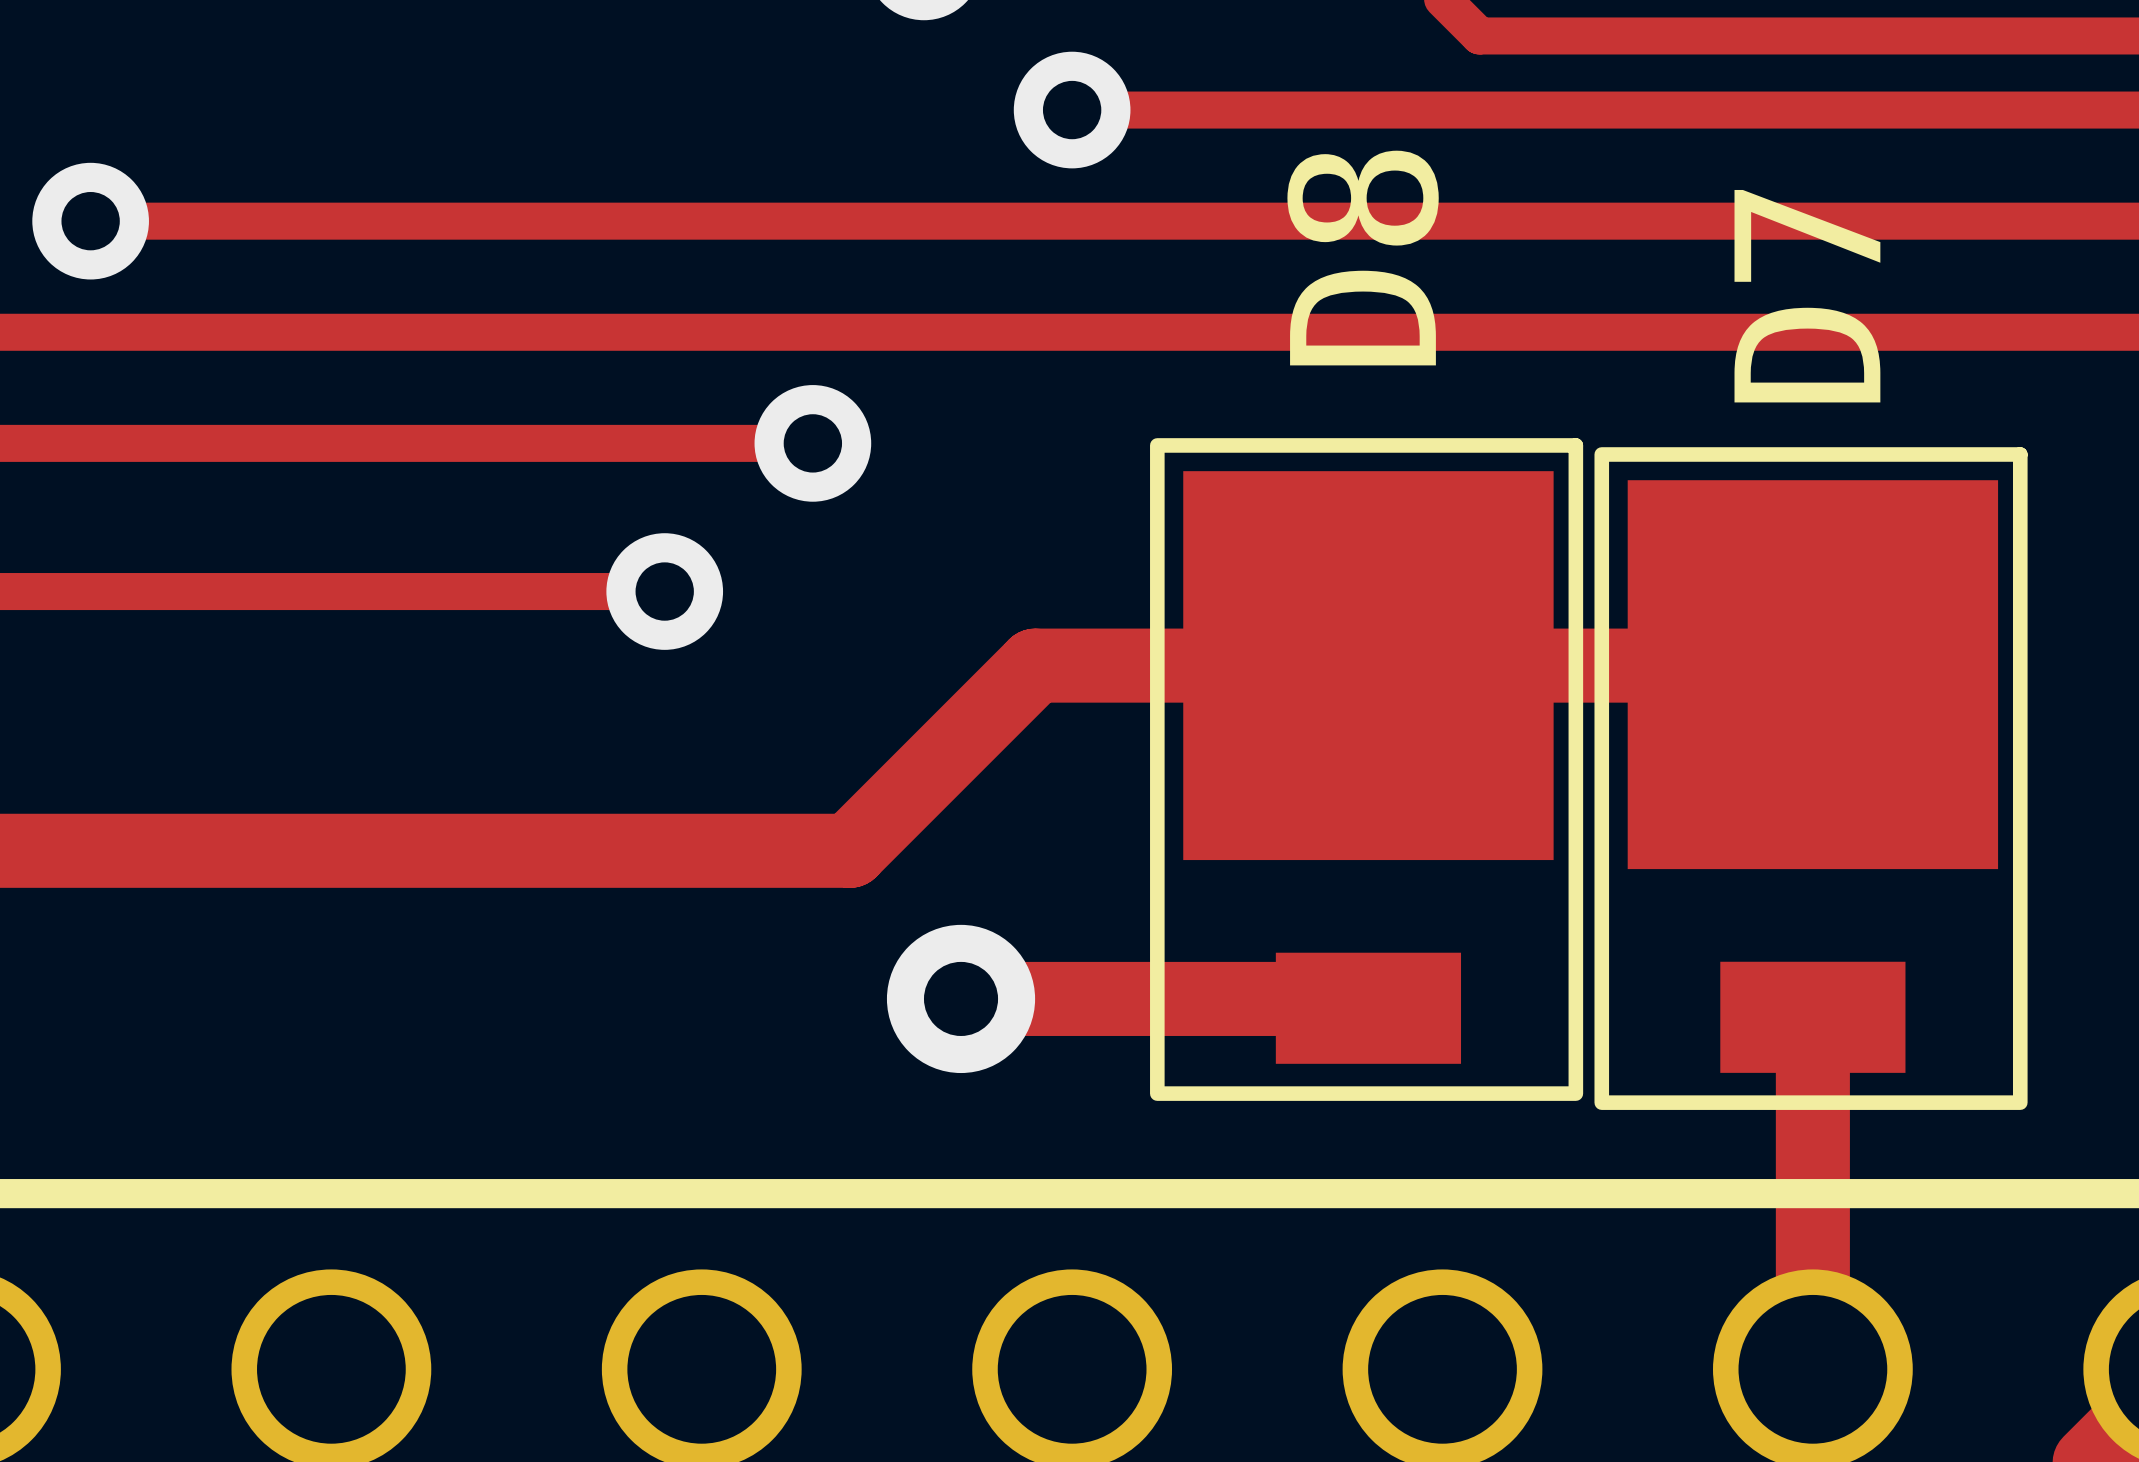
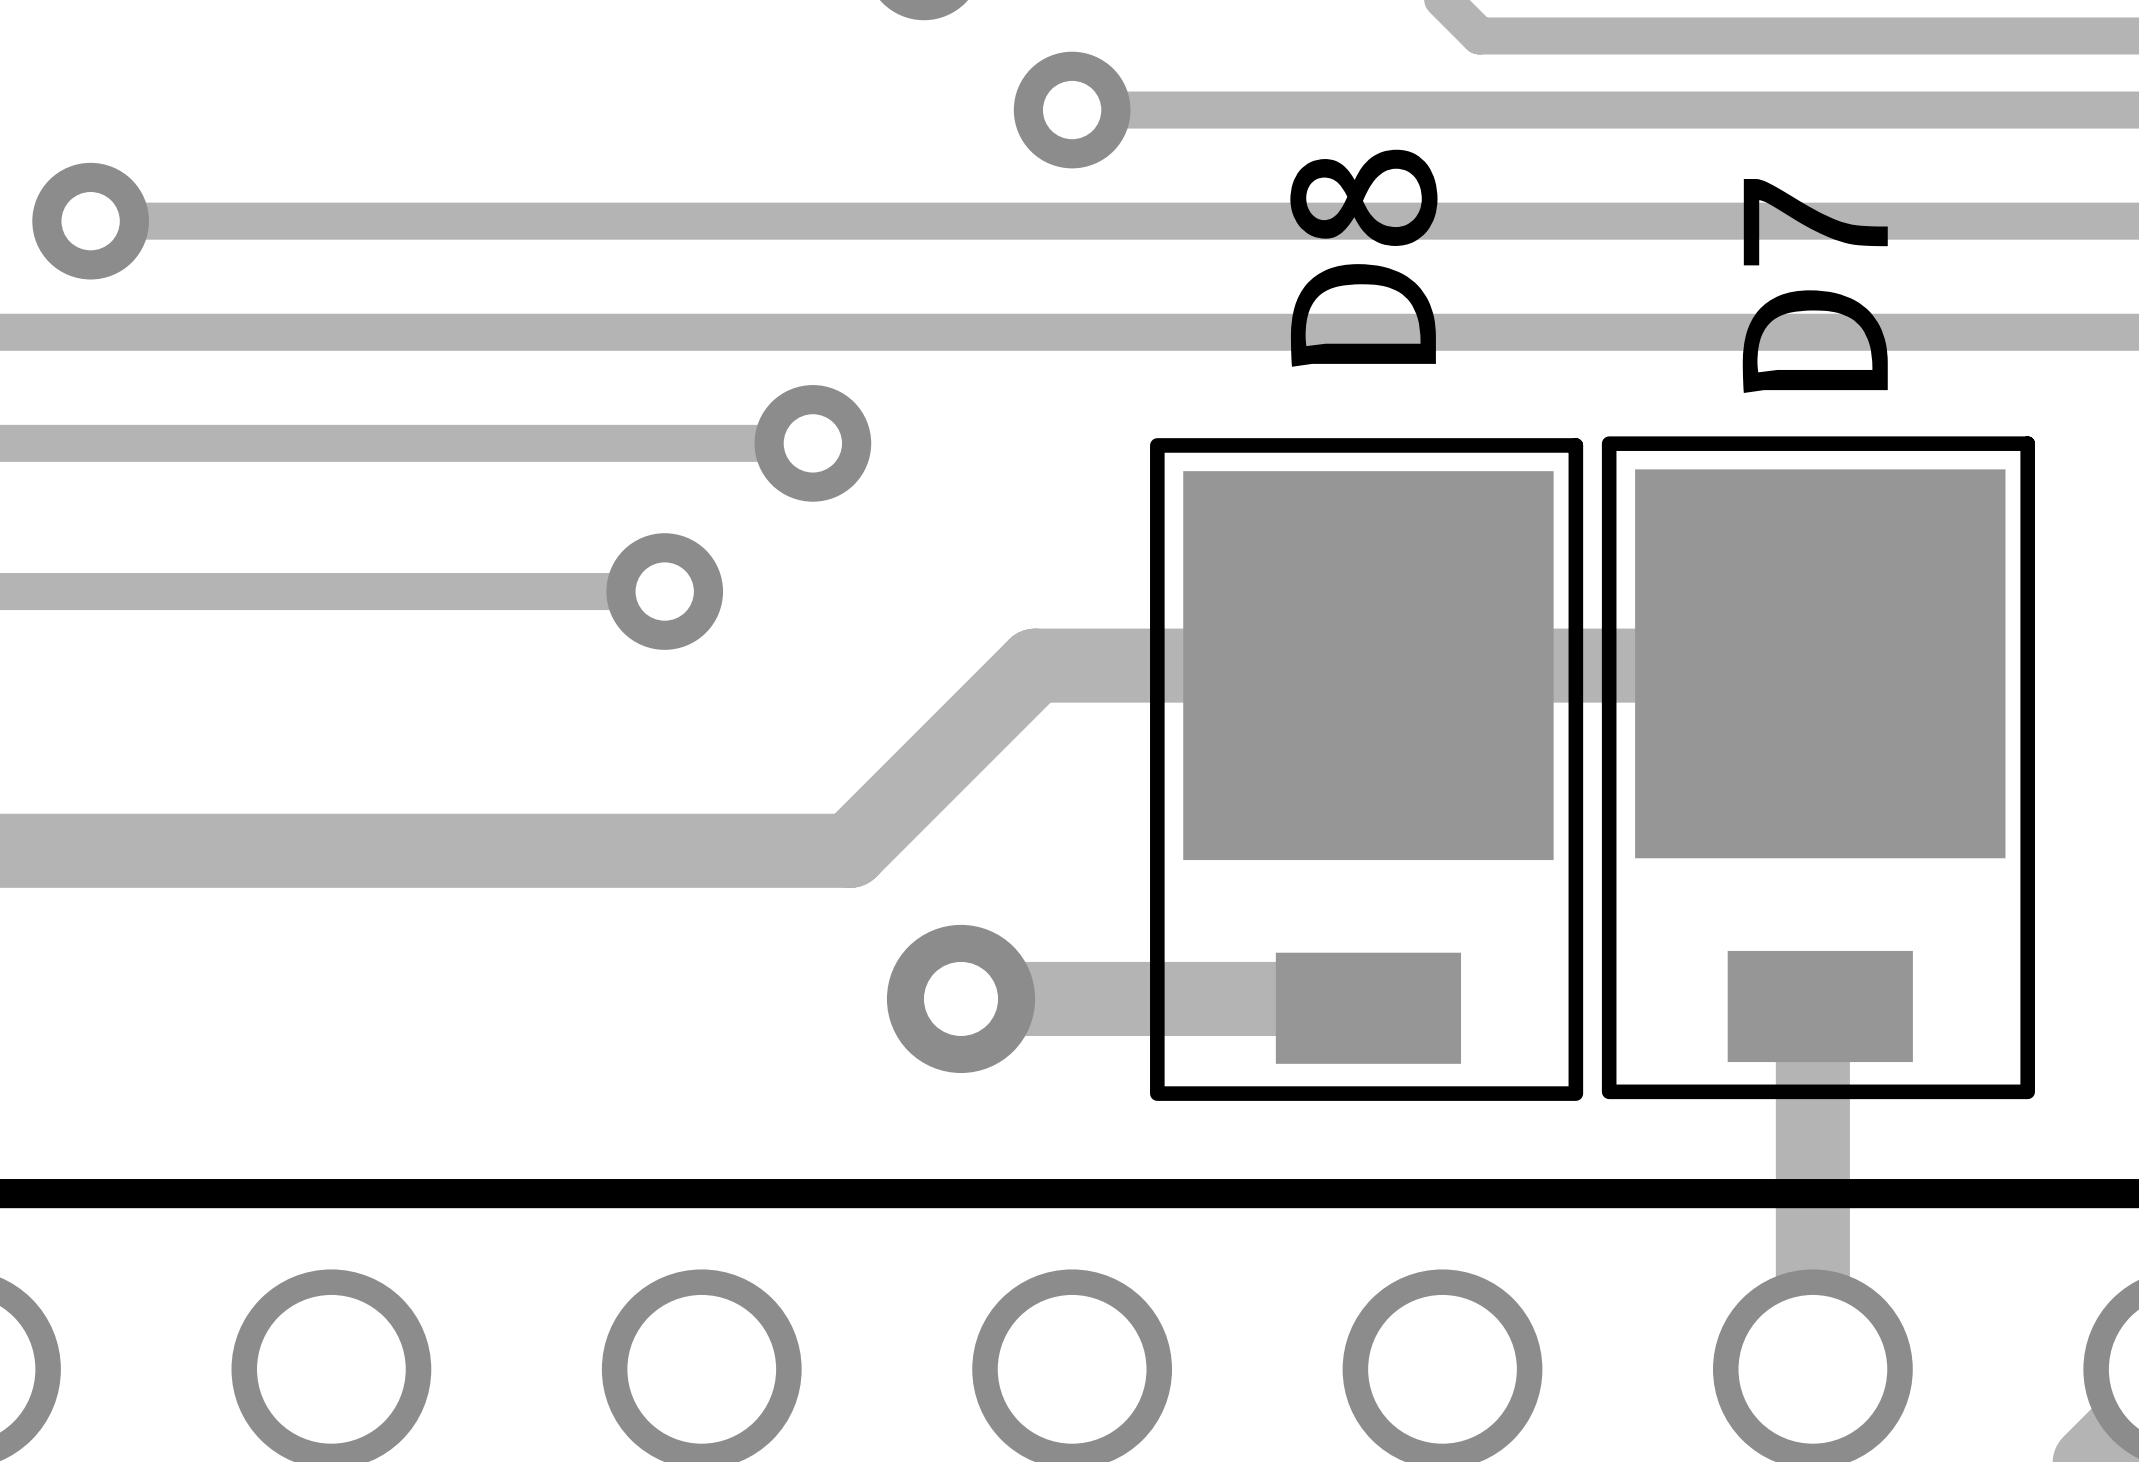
D7 position: (1811, 778) -> (1818, 767)

